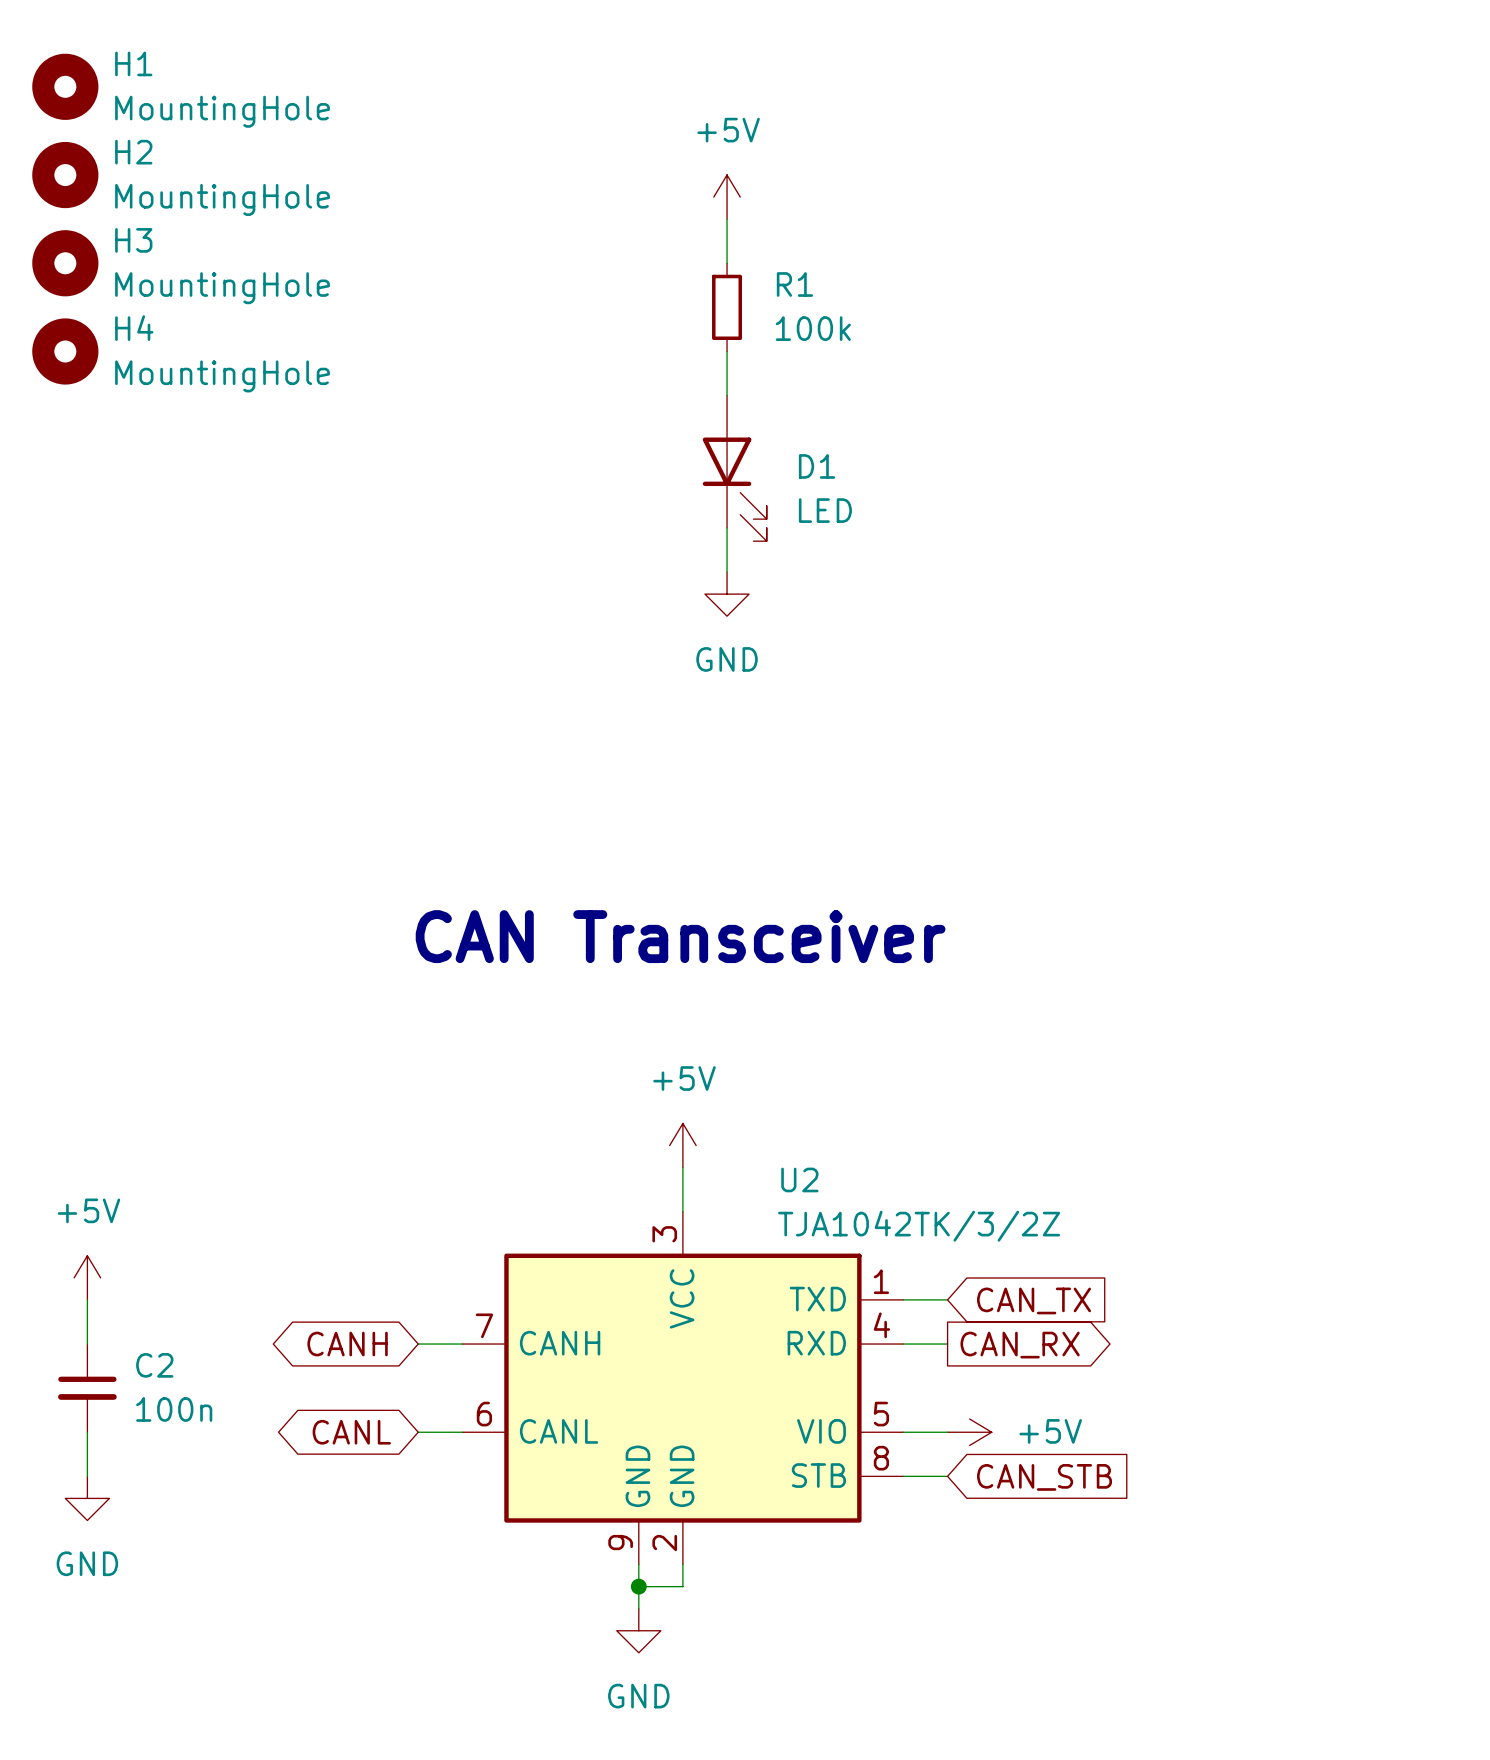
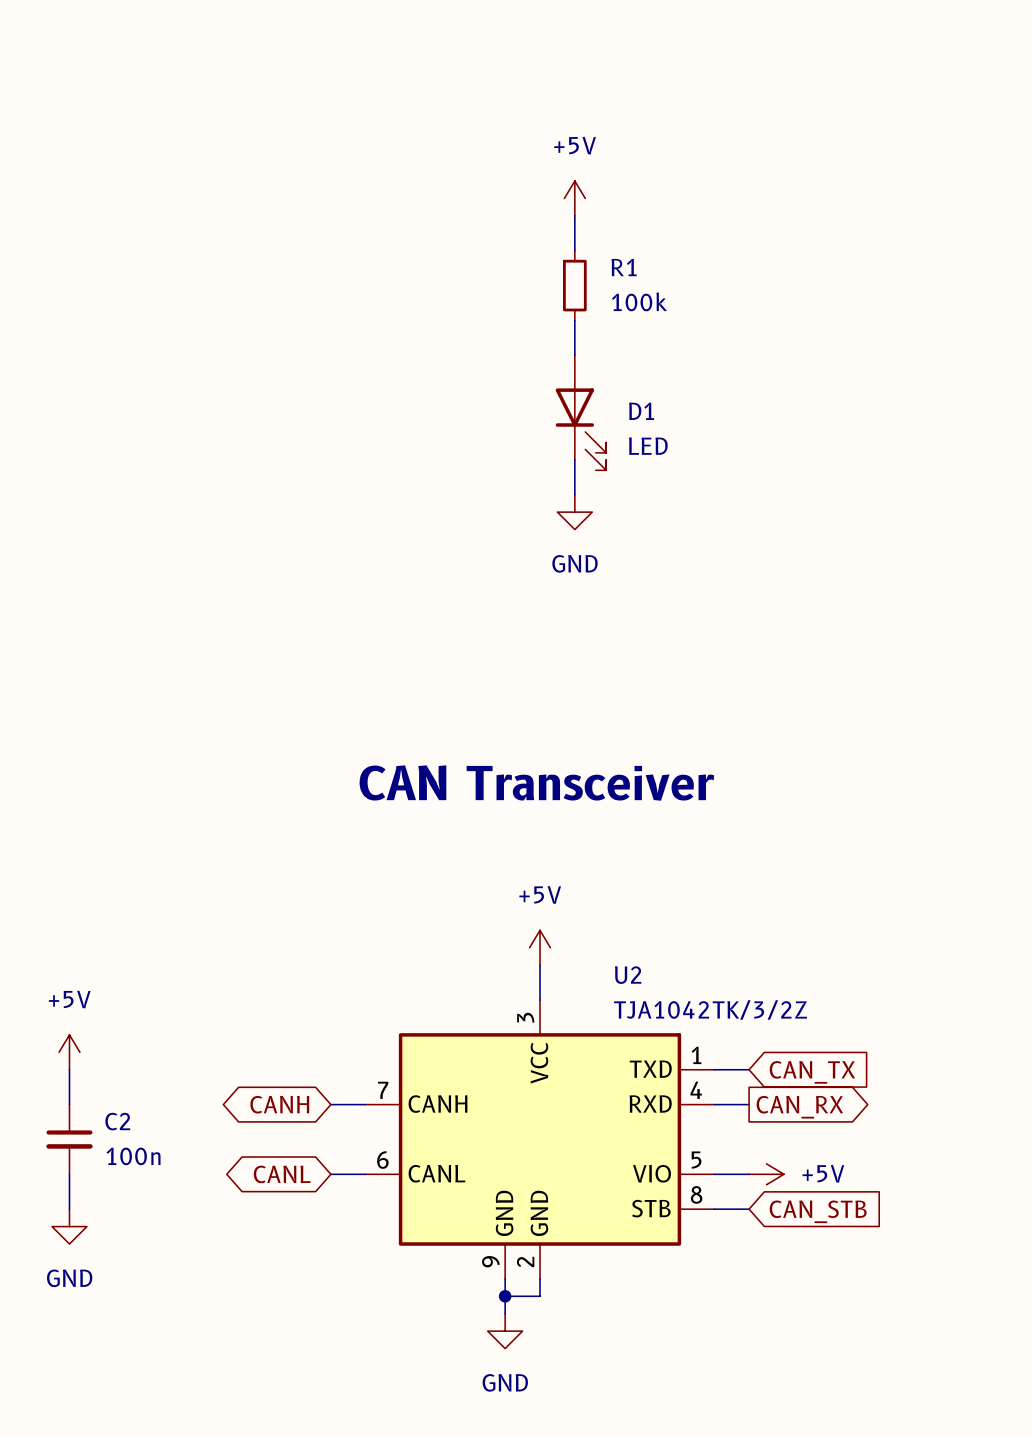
H1: MountingHole (65, 86) -> none
H2: MountingHole (65, 175) -> none
H3: MountingHole (65, 263) -> none
H4: MountingHole (65, 351) -> none

